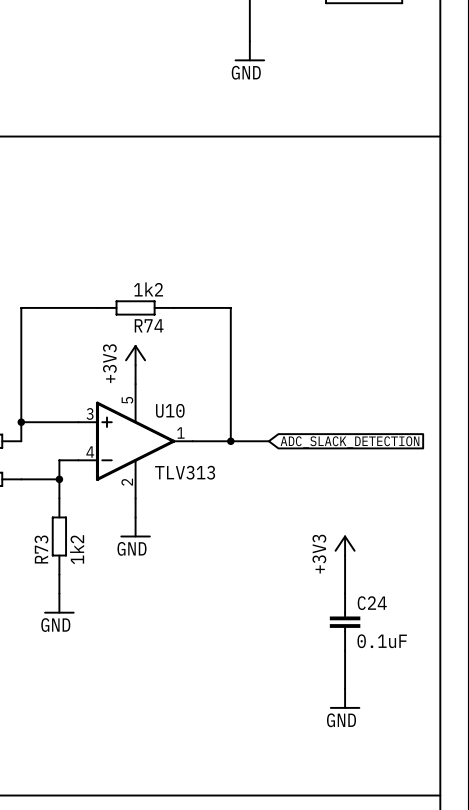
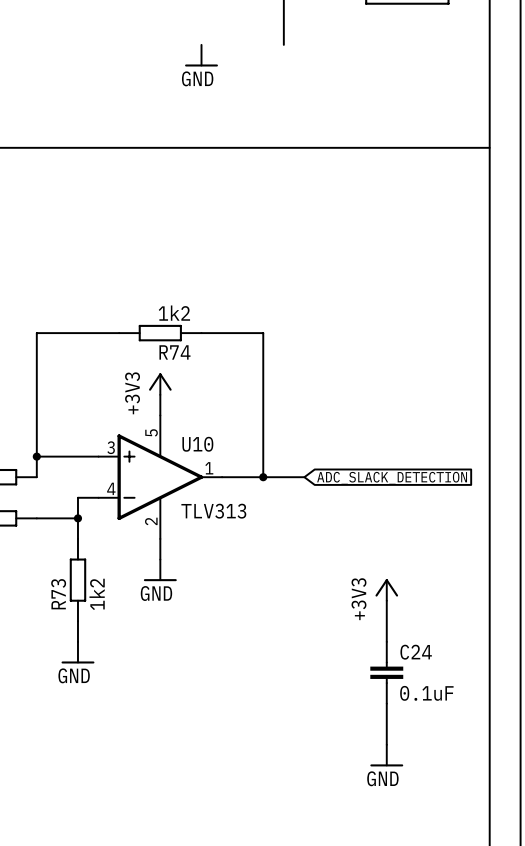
power symbol position: GND (249, 51) -> GND (201, 55)

